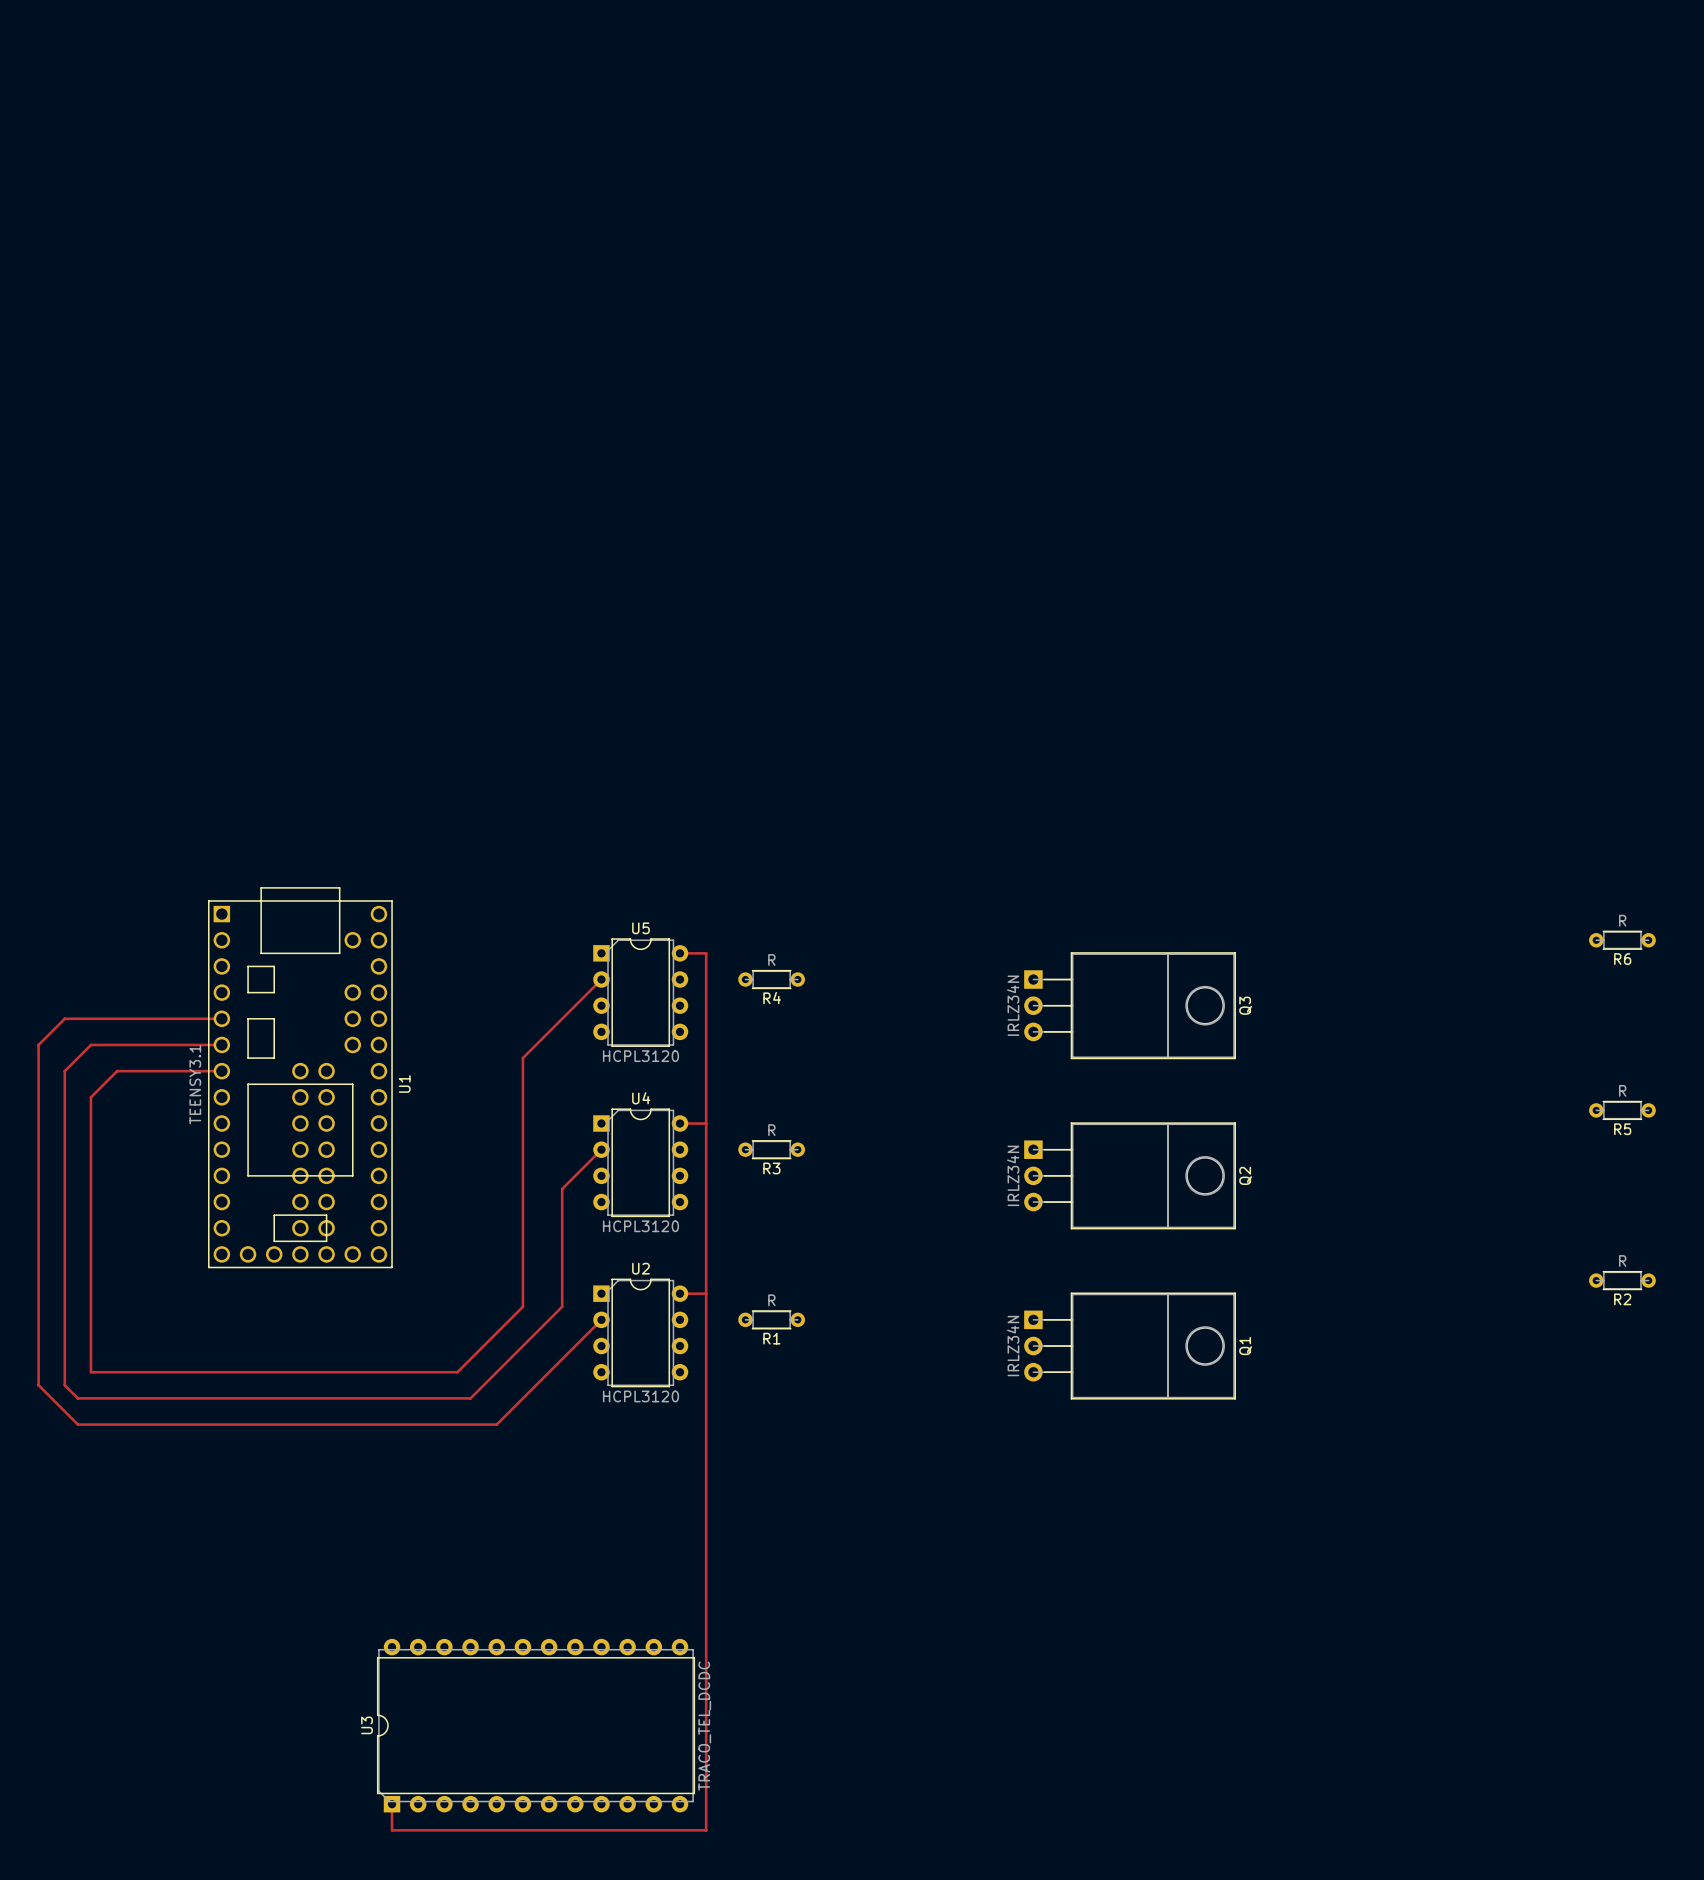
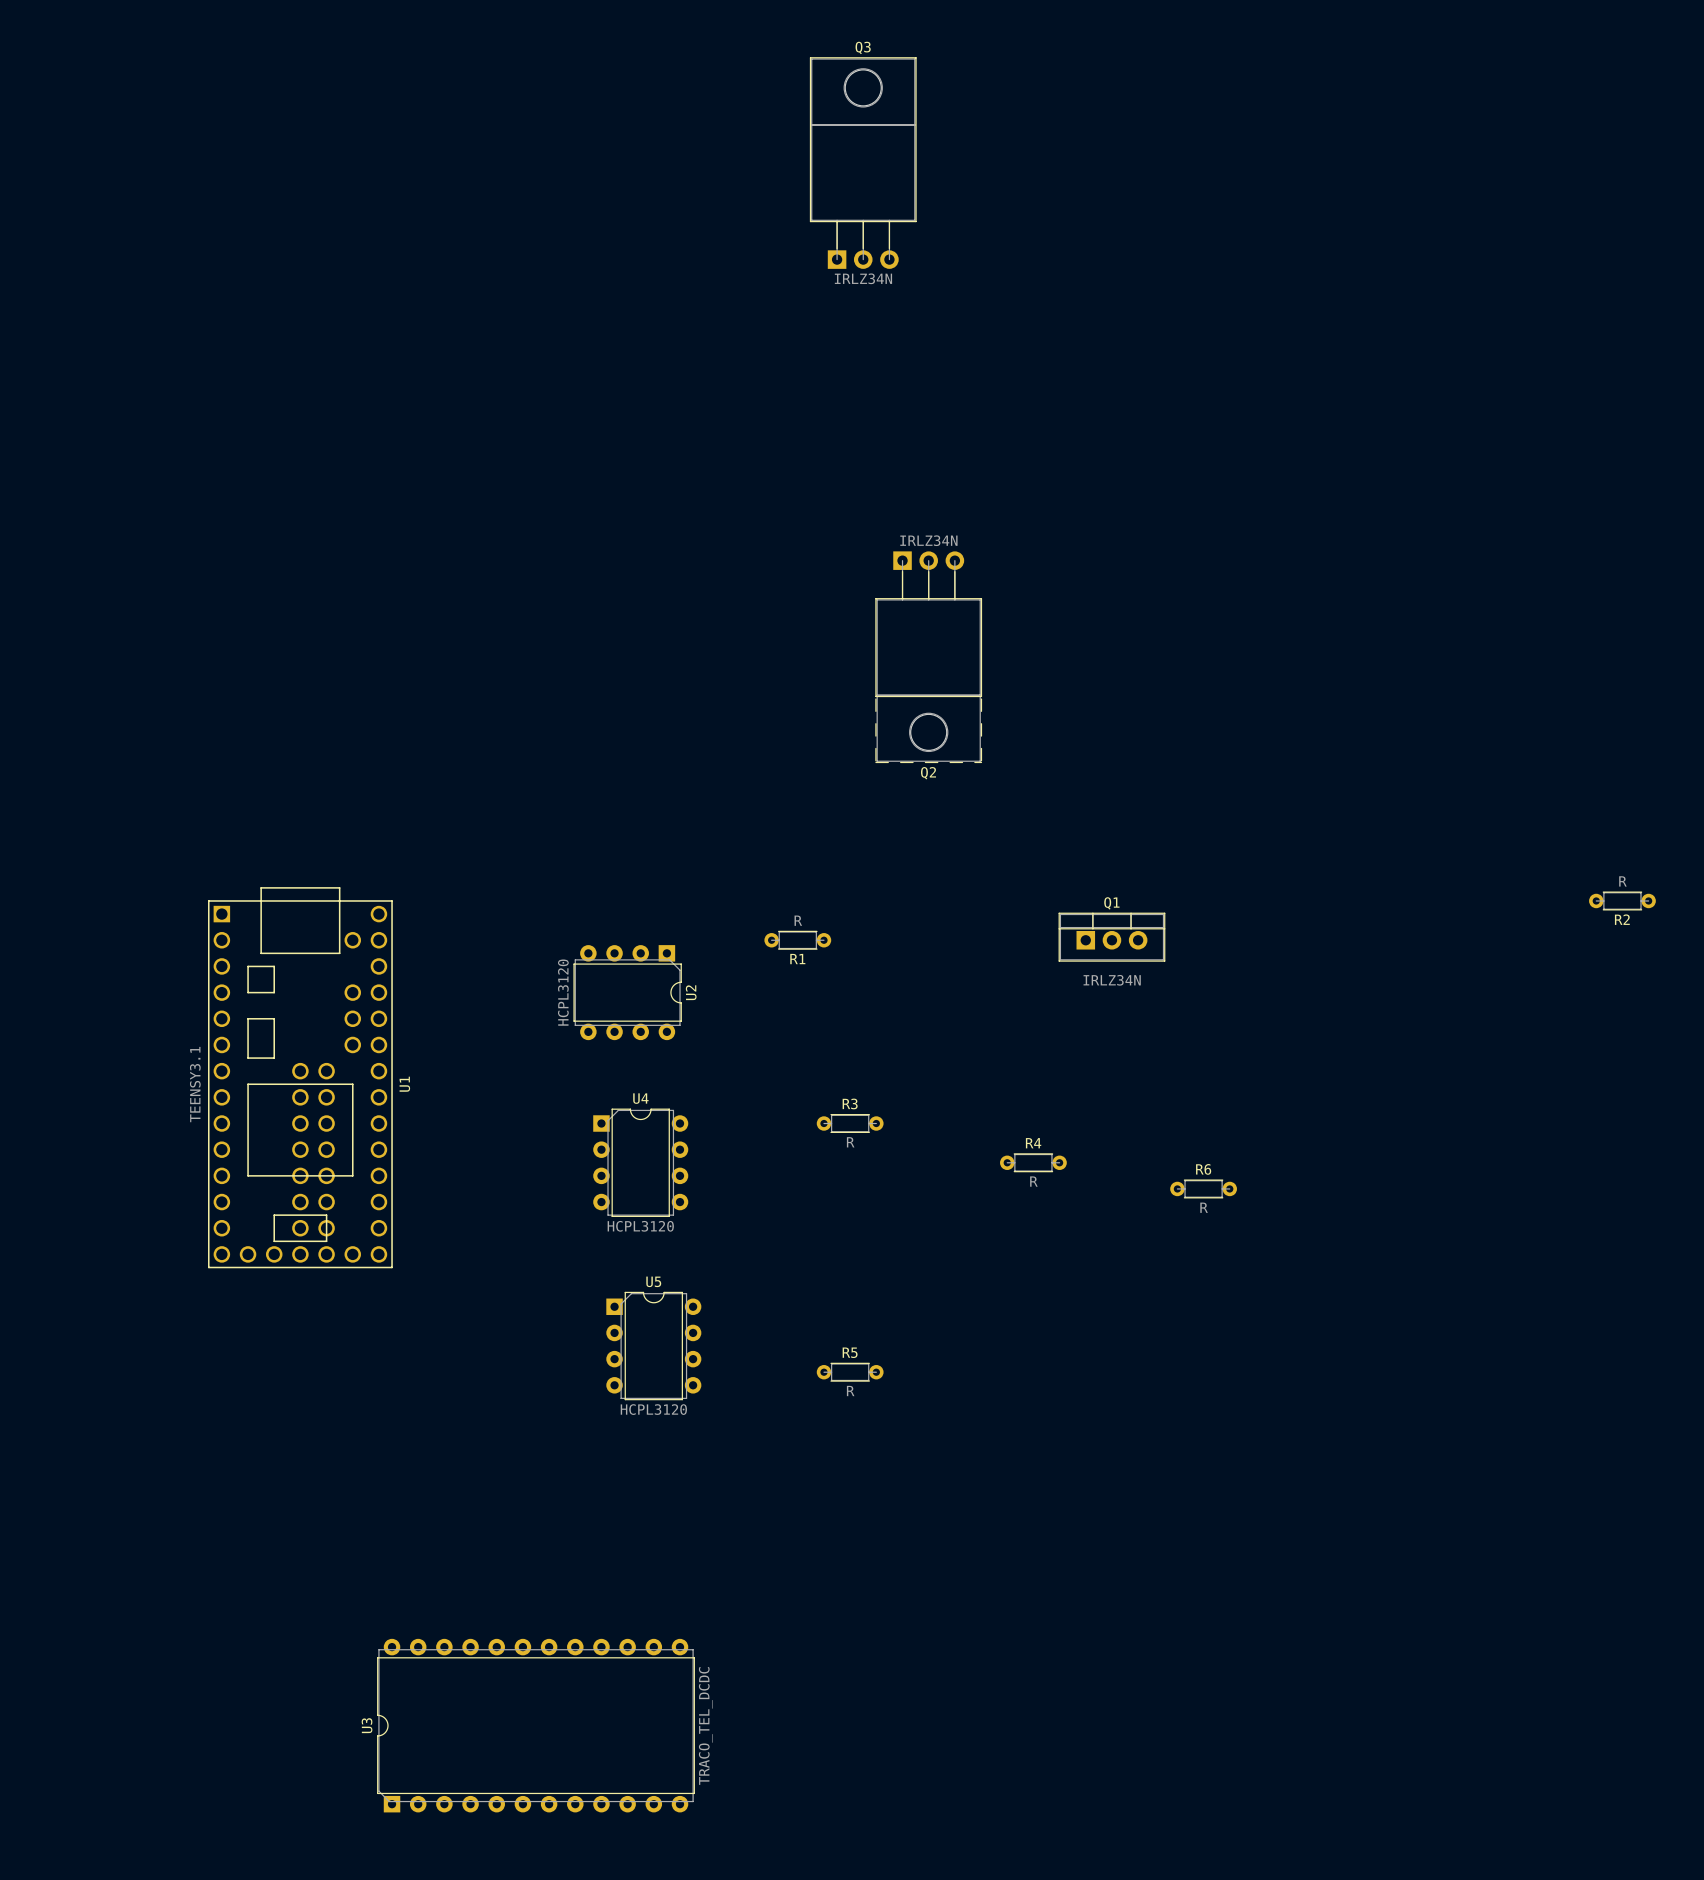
R6 value position: R (1622, 920) -> R (1204, 1207)
R6 position: (1622, 940) -> (1203, 1188)
track: (680, 953) (706, 953) (706, 1830) (392, 1830) (392, 1804) -> none
R4 value position: R (771, 959) -> R (1033, 1181)
R6 name position: R6 (1622, 959) -> R6 (1203, 1169)
track: (601, 979) (522, 1058) (522, 1306) (457, 1372) (90, 1372) (90, 1097) (117, 1071) (221, 1071) -> none
R4 position: (771, 979) -> (1033, 1162)
U5 position: (640, 992) -> (653, 1346)
R4 name position: R4 (772, 998) -> R4 (1033, 1143)
Q3 rotation: 0° (1129, 1005) -> 90° counterclockwise (863, 163)
Q3 position: (1129, 1005) -> (863, 163)
track: (221, 1018) (64, 1018) (38, 1044) (38, 1385) (77, 1424) (496, 1424) (601, 1319) -> none
track: (221, 1044) (90, 1044) (64, 1071) (64, 1385) (77, 1398) (470, 1398) (562, 1306) (562, 1188) (601, 1149) -> none
R5 value position: R (1622, 1090) -> R (850, 1391)
R5 position: (1622, 1110) -> (850, 1372)
Q2 footprint: [1024, 1122, 1236, 1230] -> [875, 551, 983, 764]
track: (680, 1123) (706, 1123) -> none
R5 name position: R5 (1622, 1129) -> R5 (850, 1352)
R3 value position: R (771, 1130) -> R (850, 1142)
R3 position: (771, 1149) -> (850, 1123)
R3 name position: R3 (771, 1168) -> R3 (850, 1103)
Q2 value position: IRLZ34N (1013, 1175) -> IRLZ34N (928, 540)
Q2 name position: Q2 (1245, 1175) -> Q2 (928, 773)
R2 position: (1622, 1280) -> (1622, 900)
Q1 footprint: [1024, 1292, 1236, 1400] -> [1058, 912, 1166, 962]
track: (680, 1293) (706, 1293) -> none
R1 position: (771, 1319) -> (797, 940)
U2 rotation: 0° (640, 1332) -> 90° clockwise (627, 992)
U2 position: (640, 1332) -> (627, 992)
Q1 value position: IRLZ34N (1013, 1346) -> IRLZ34N (1112, 980)
Q1 name position: Q1 (1245, 1346) -> Q1 (1111, 903)

